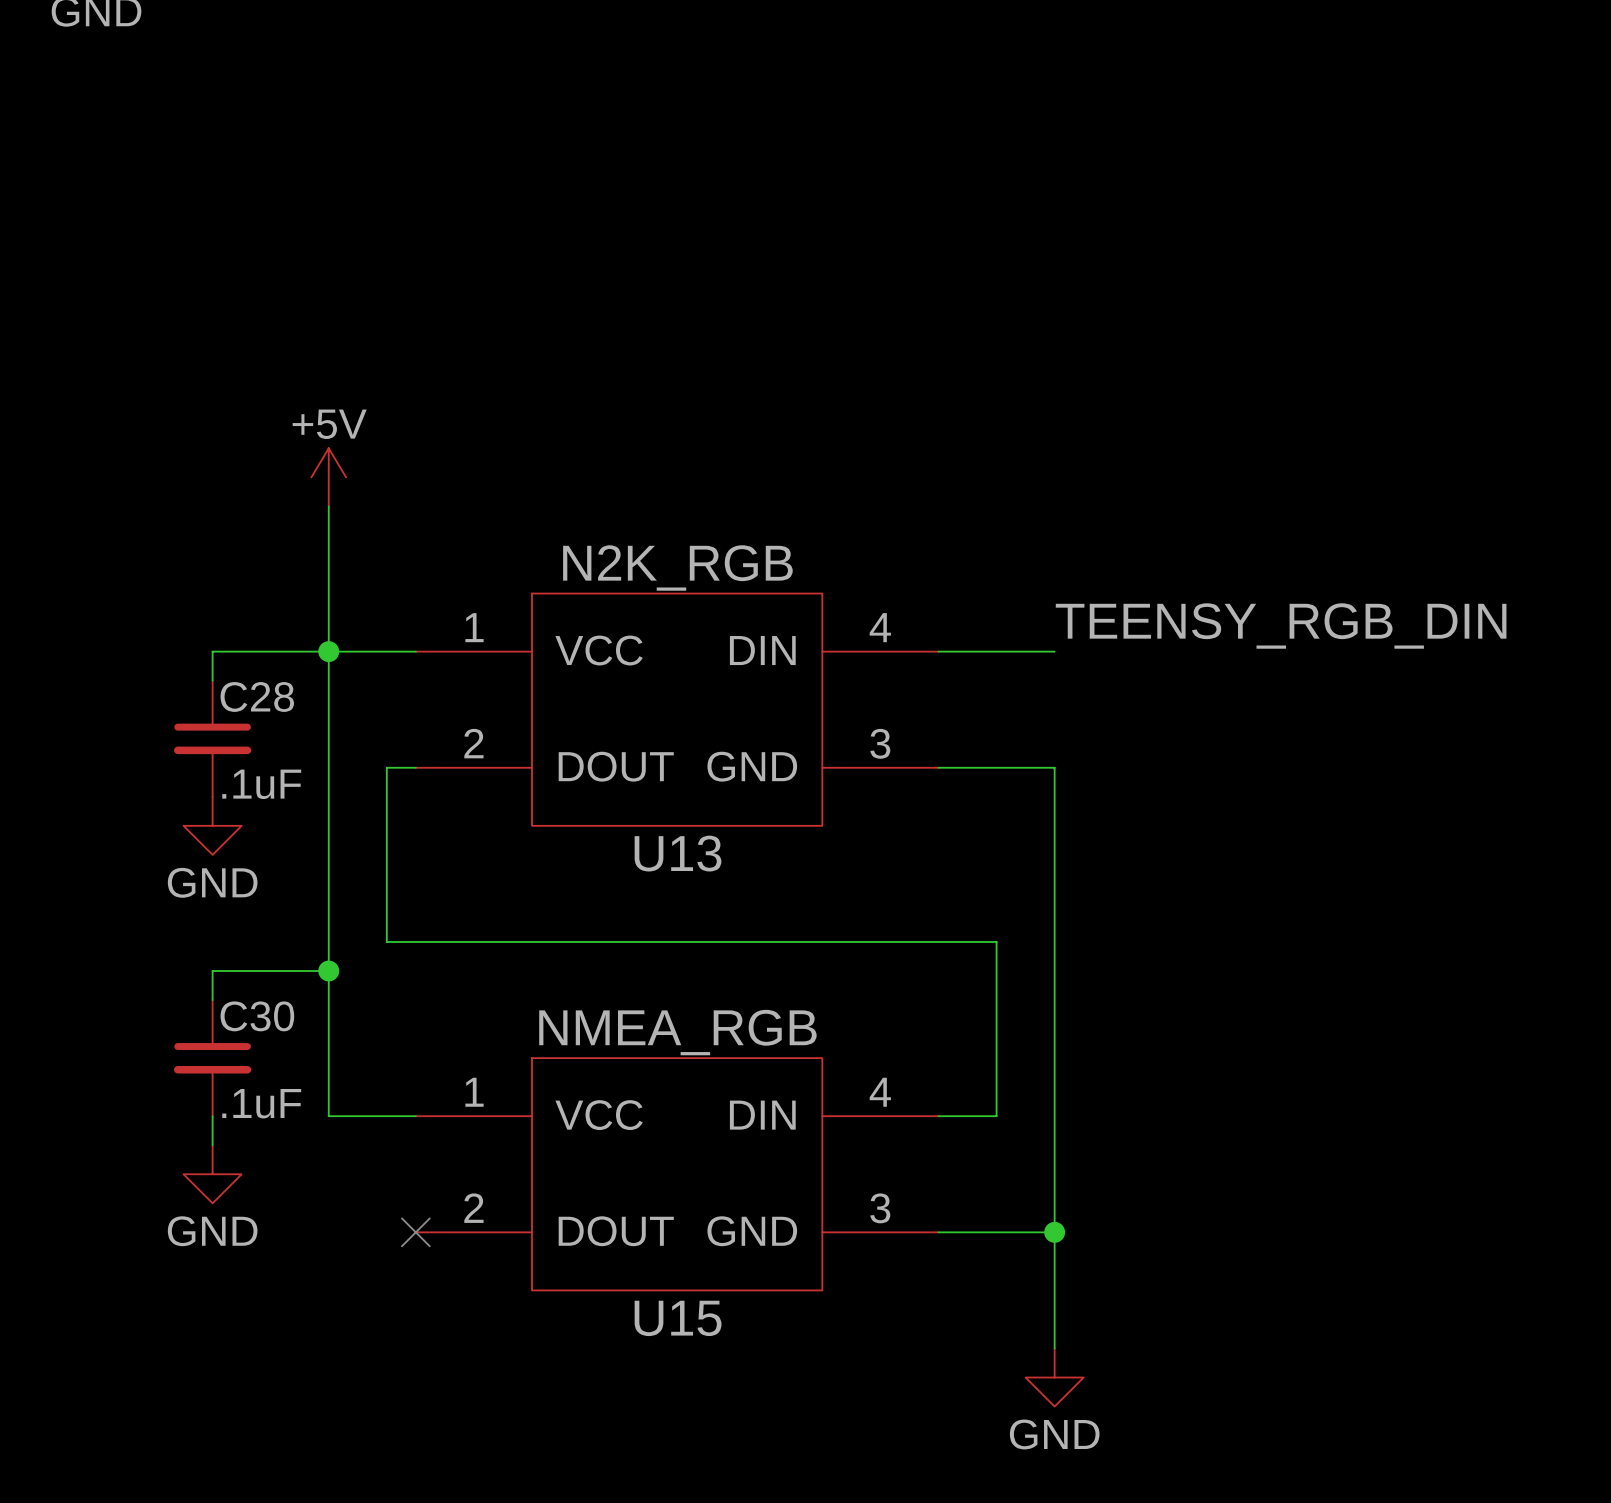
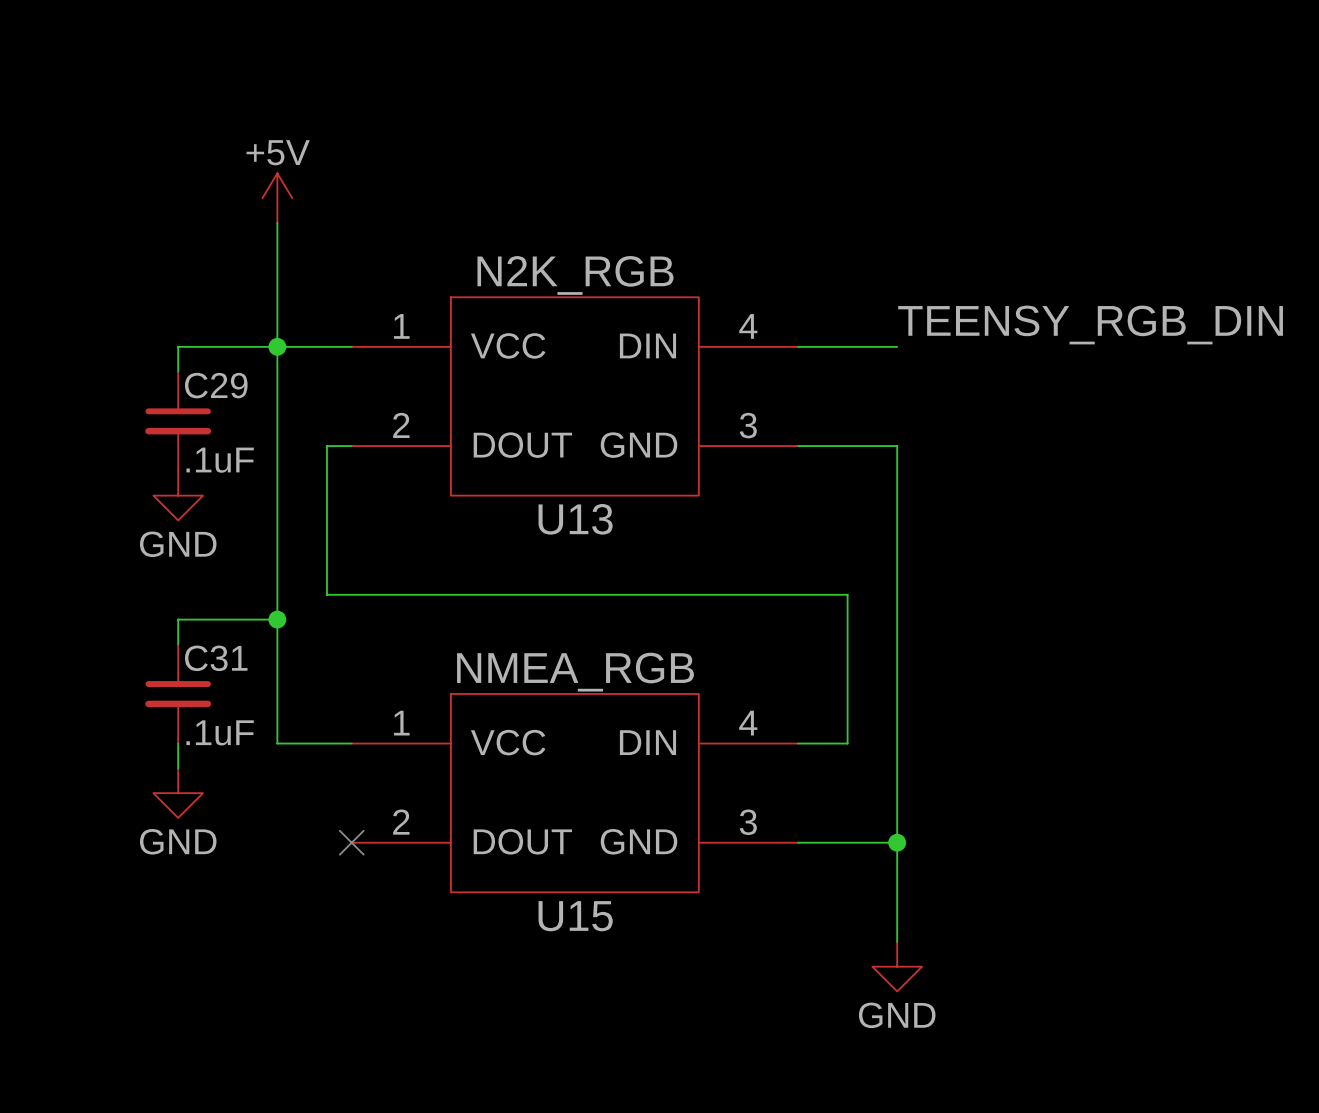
C28 name: C28 (257, 696) -> C29 (216, 385)
C30 name: C30 (257, 1016) -> C31 (216, 658)

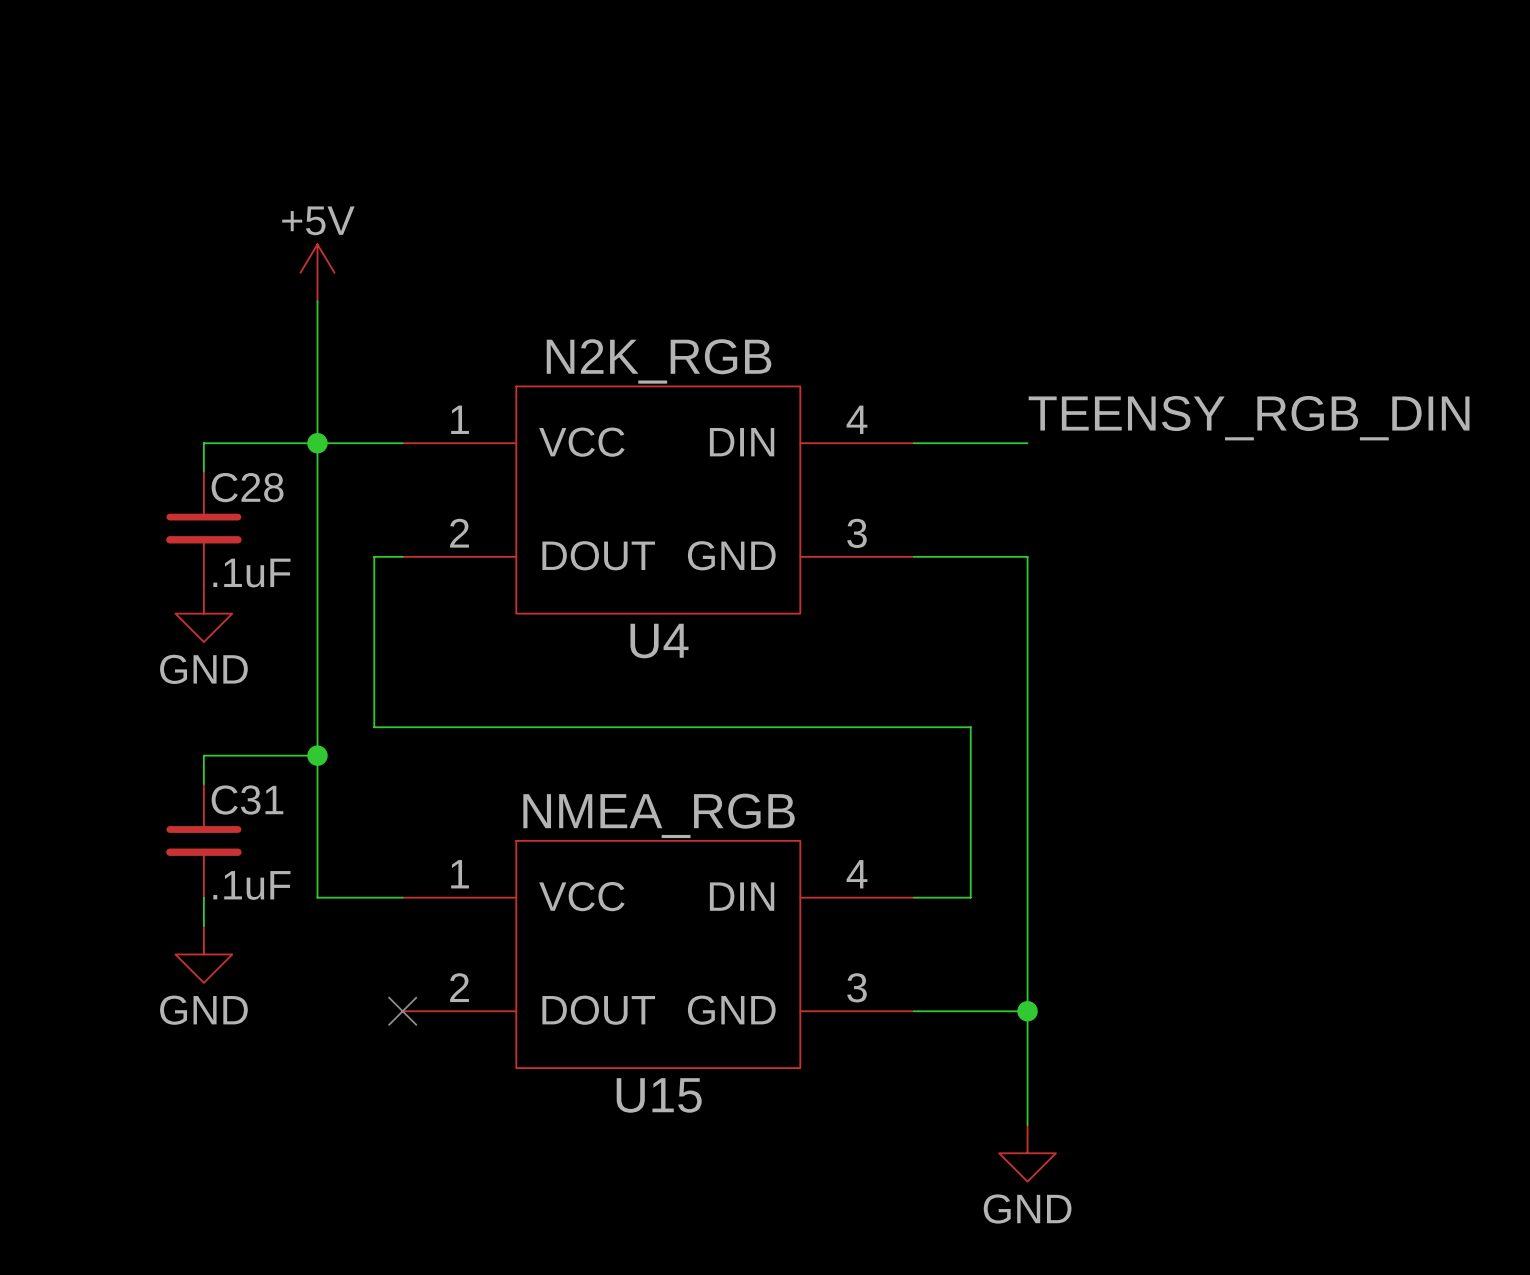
C29 name: C29 (216, 385) -> C28 (247, 487)
U13 name: U13 (575, 519) -> U4 (659, 641)

